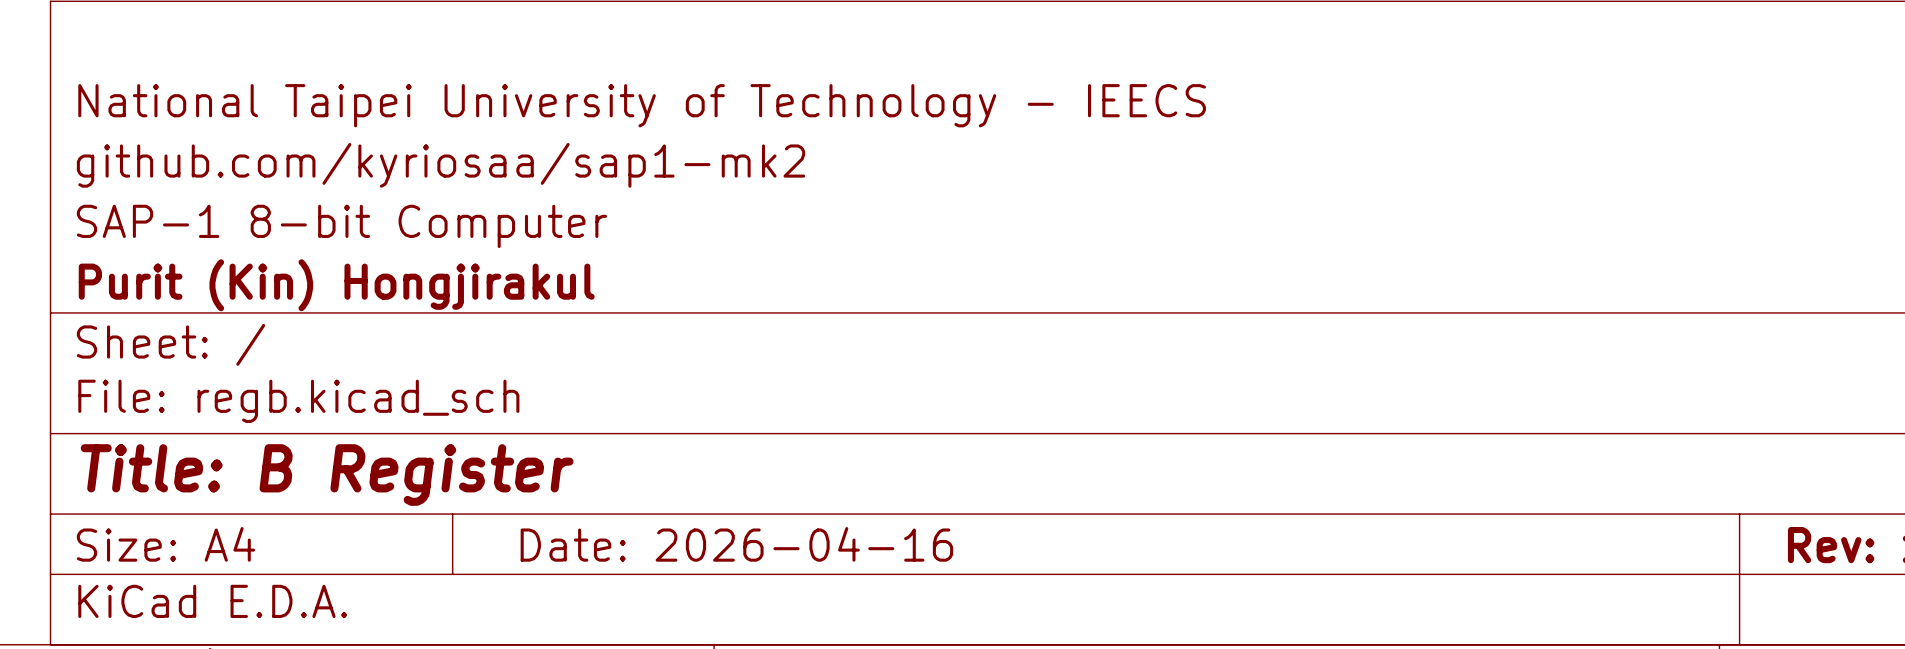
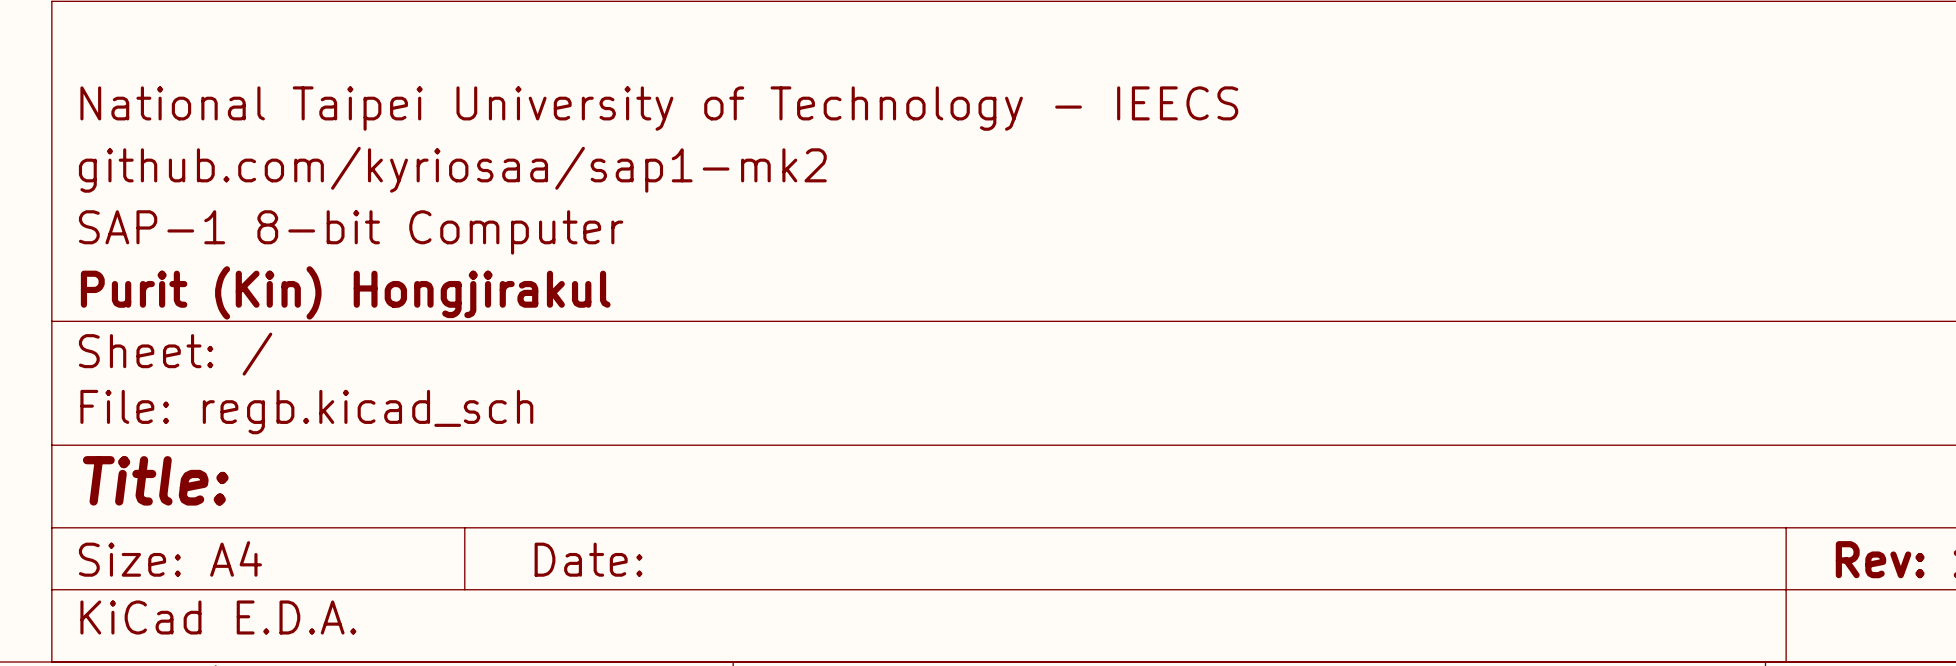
title block: Title: B Register (327, 475) -> Title: (155, 480)
title block: Date: 2026-04-16 (736, 544) -> Date: (588, 559)

